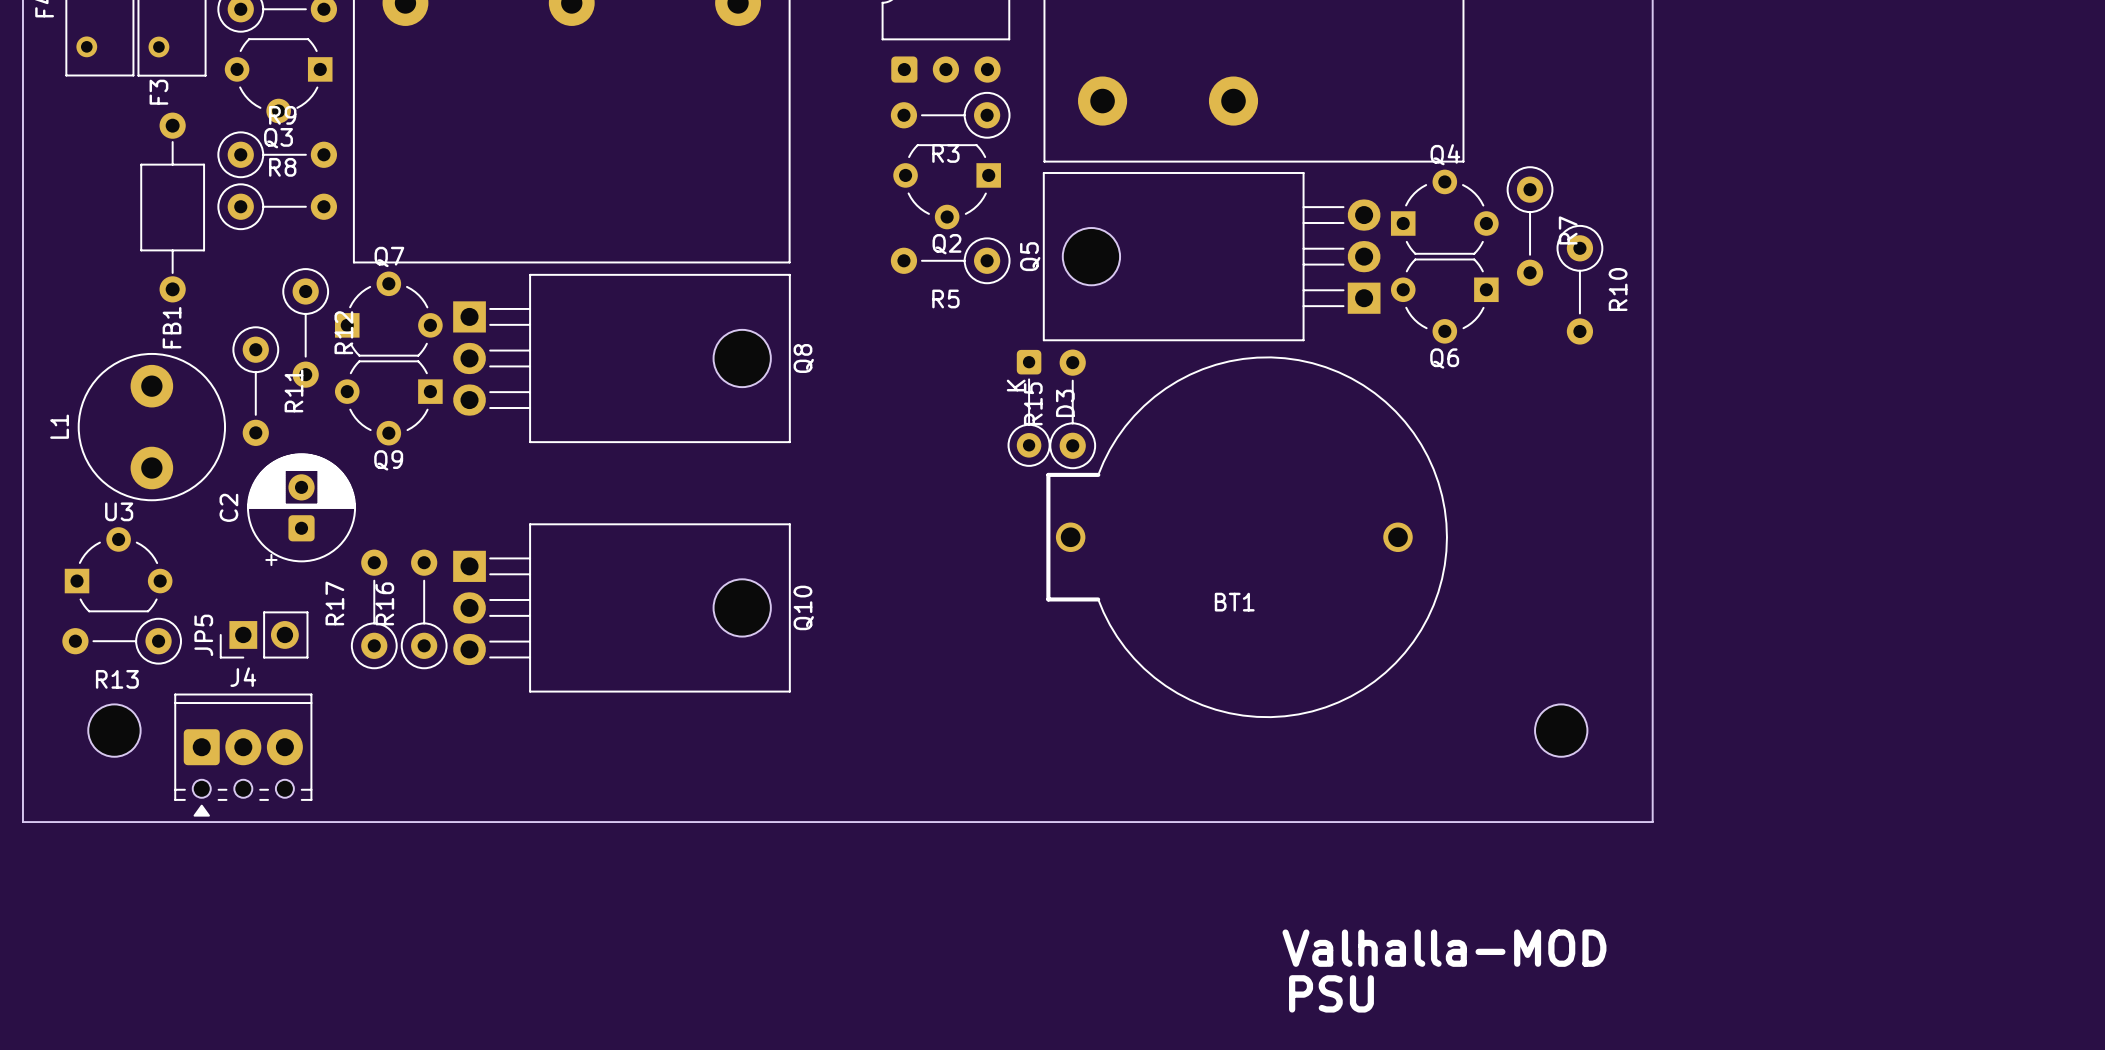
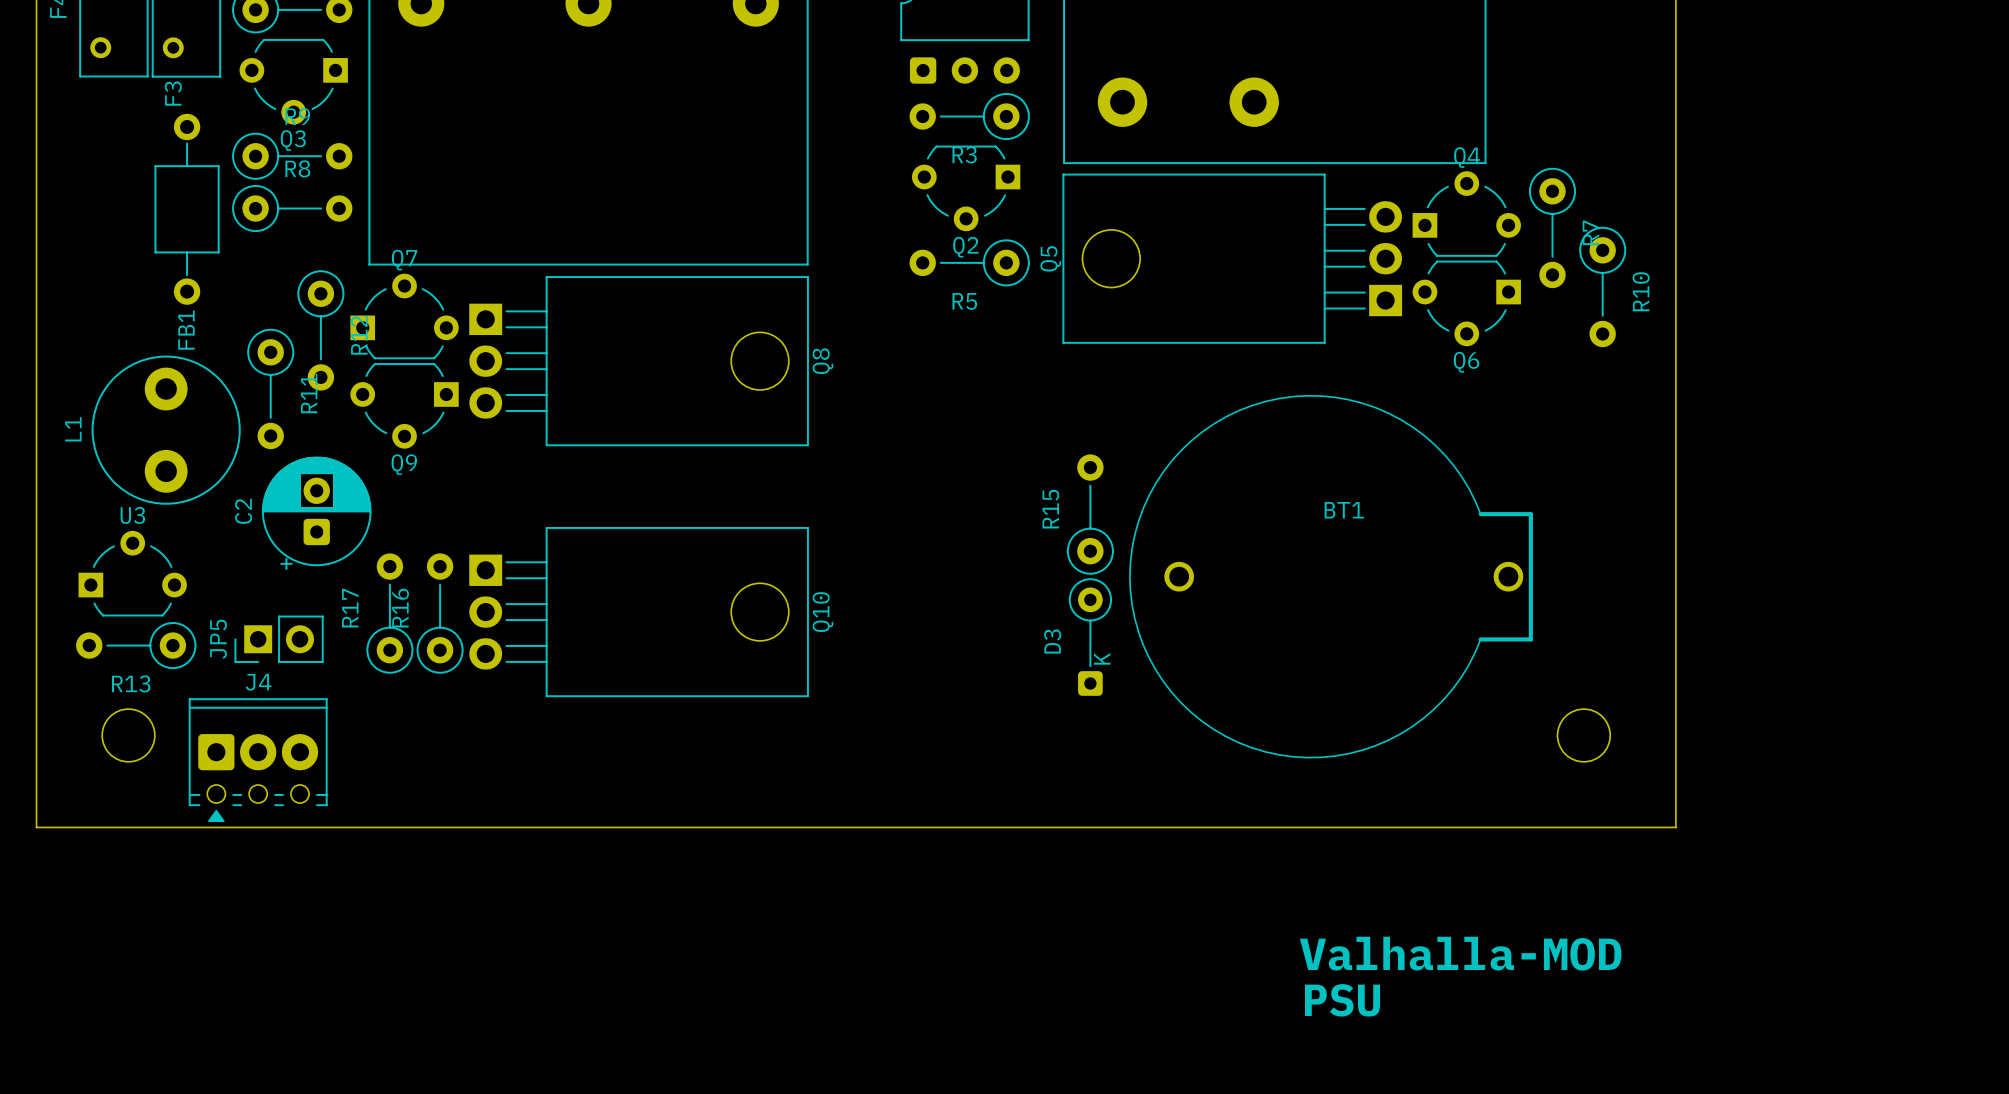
D3 rotation: 0° (1029, 408) -> 180° (1090, 637)
D3 position: (1029, 408) -> (1090, 637)
R15 position: (1072, 409) -> (1090, 514)
BT1 rotation: 0° (1247, 537) -> 180° (1331, 576)

